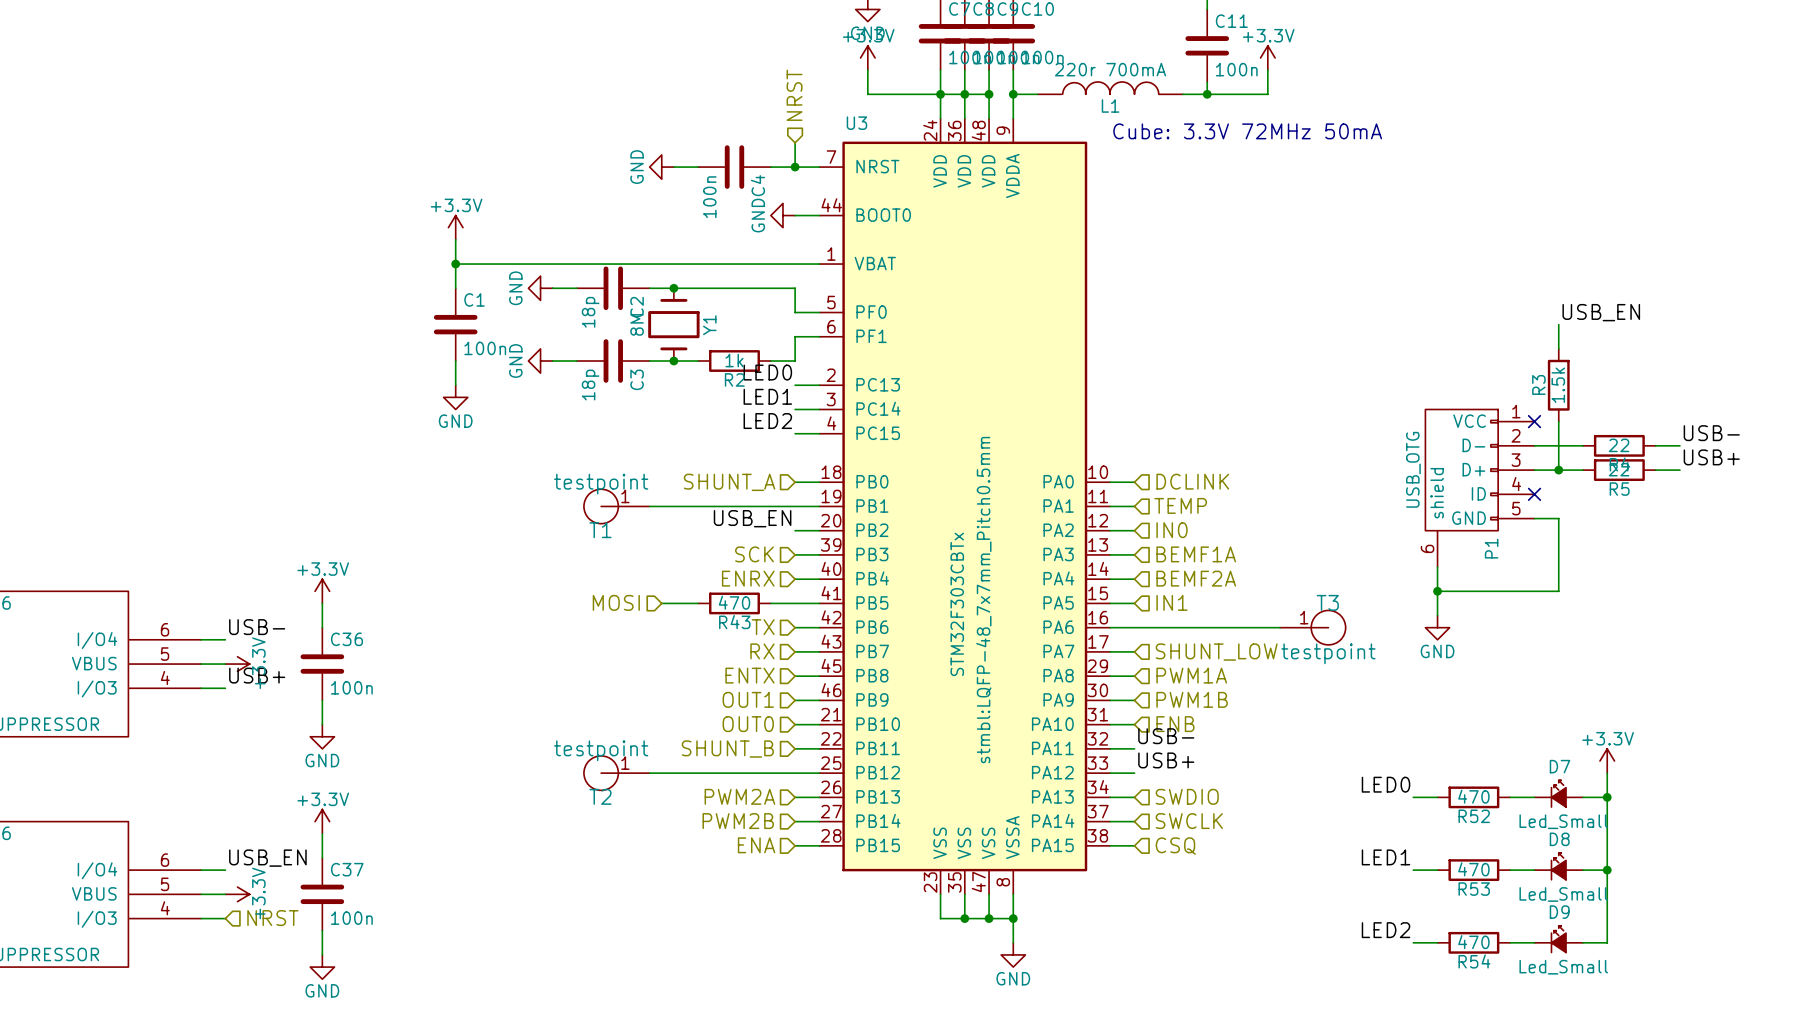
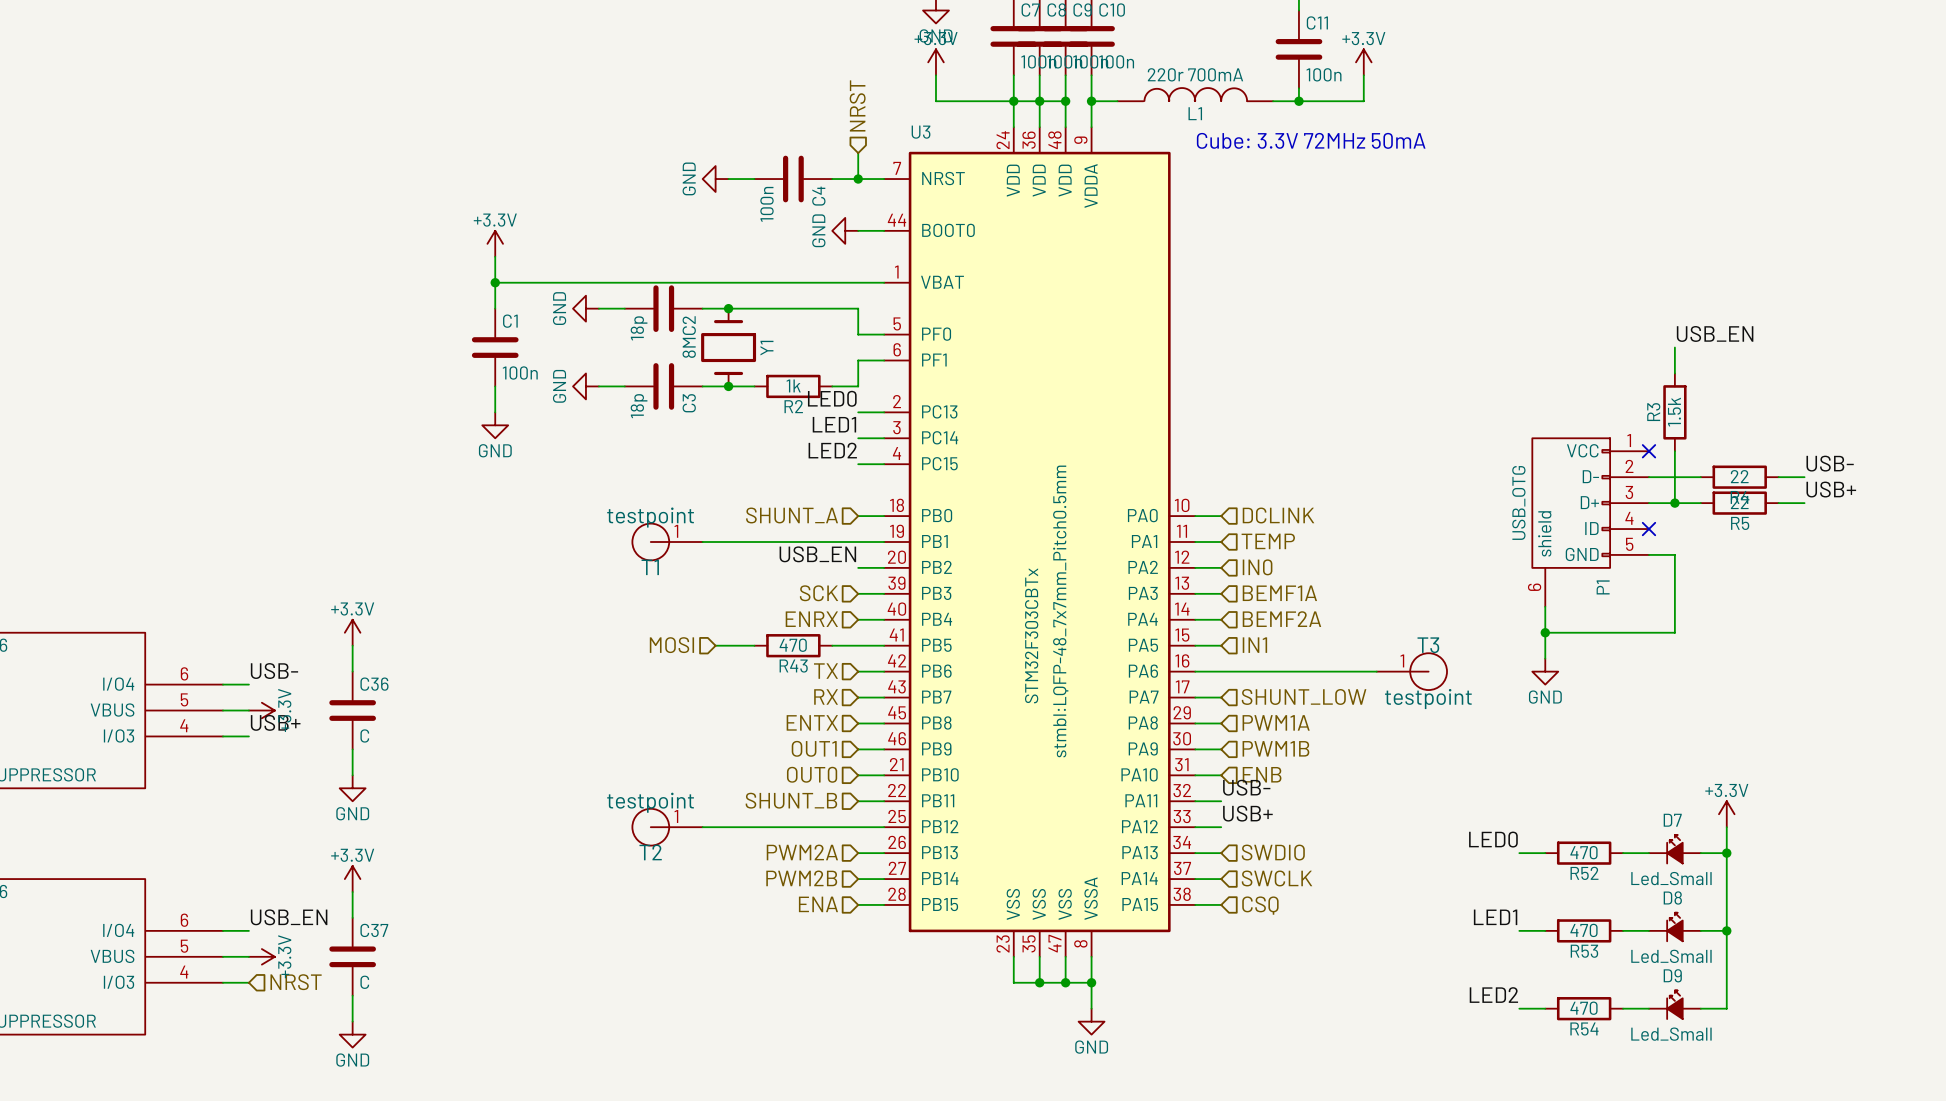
C36 value: 100n (351, 687) -> C (364, 735)
C37 value: 100n (351, 918) -> C (364, 982)

